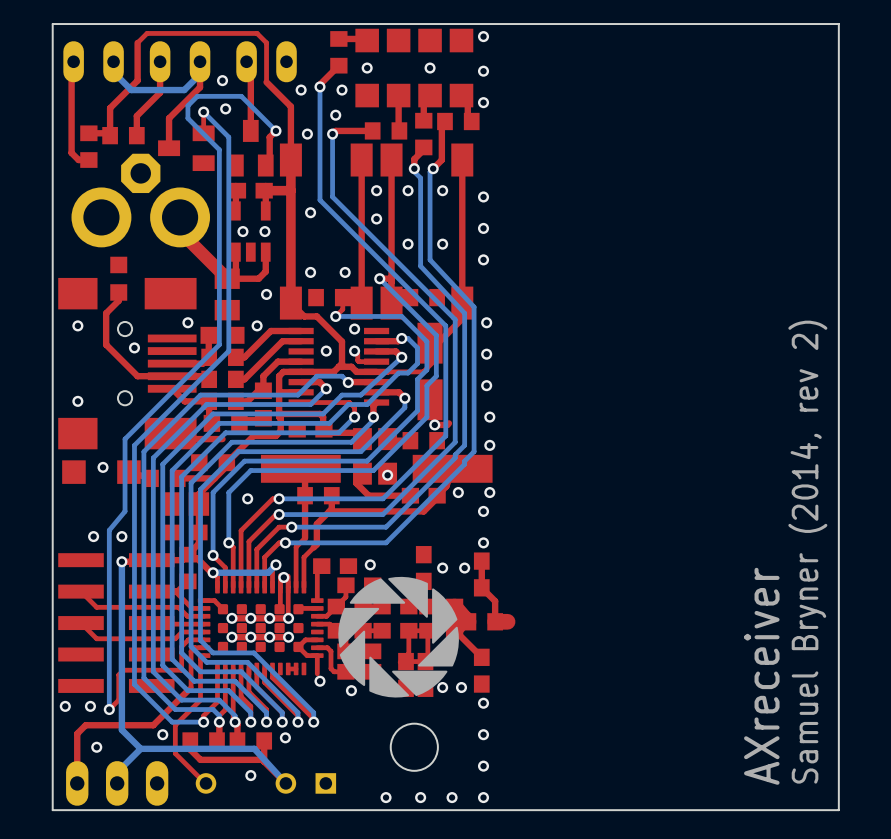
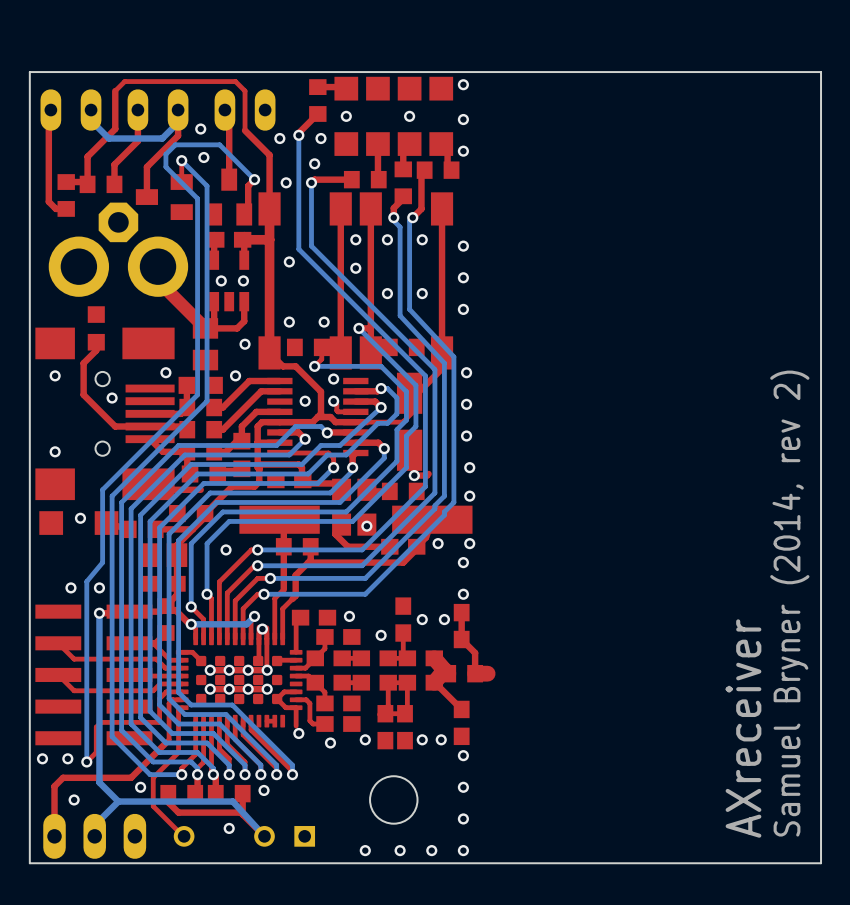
drawing: [338, 576, 459, 698] -> none

